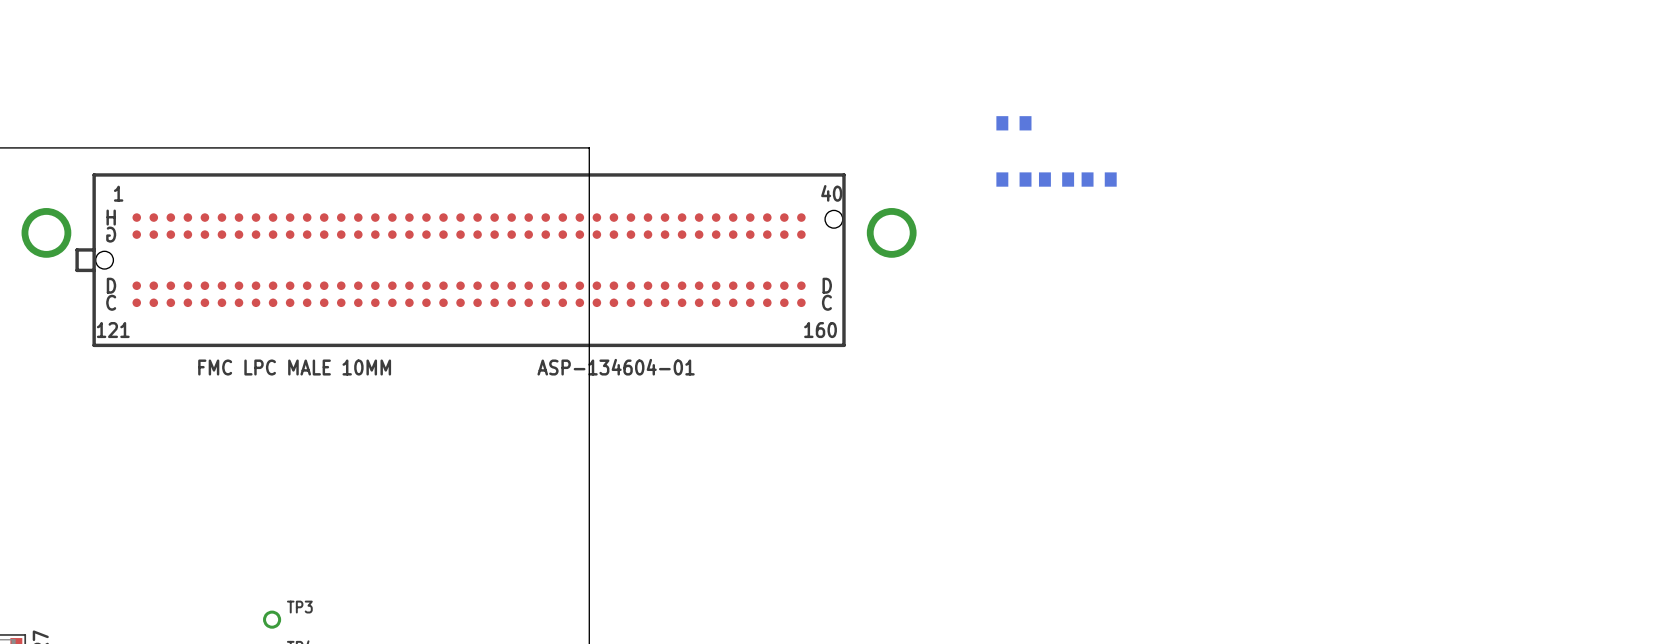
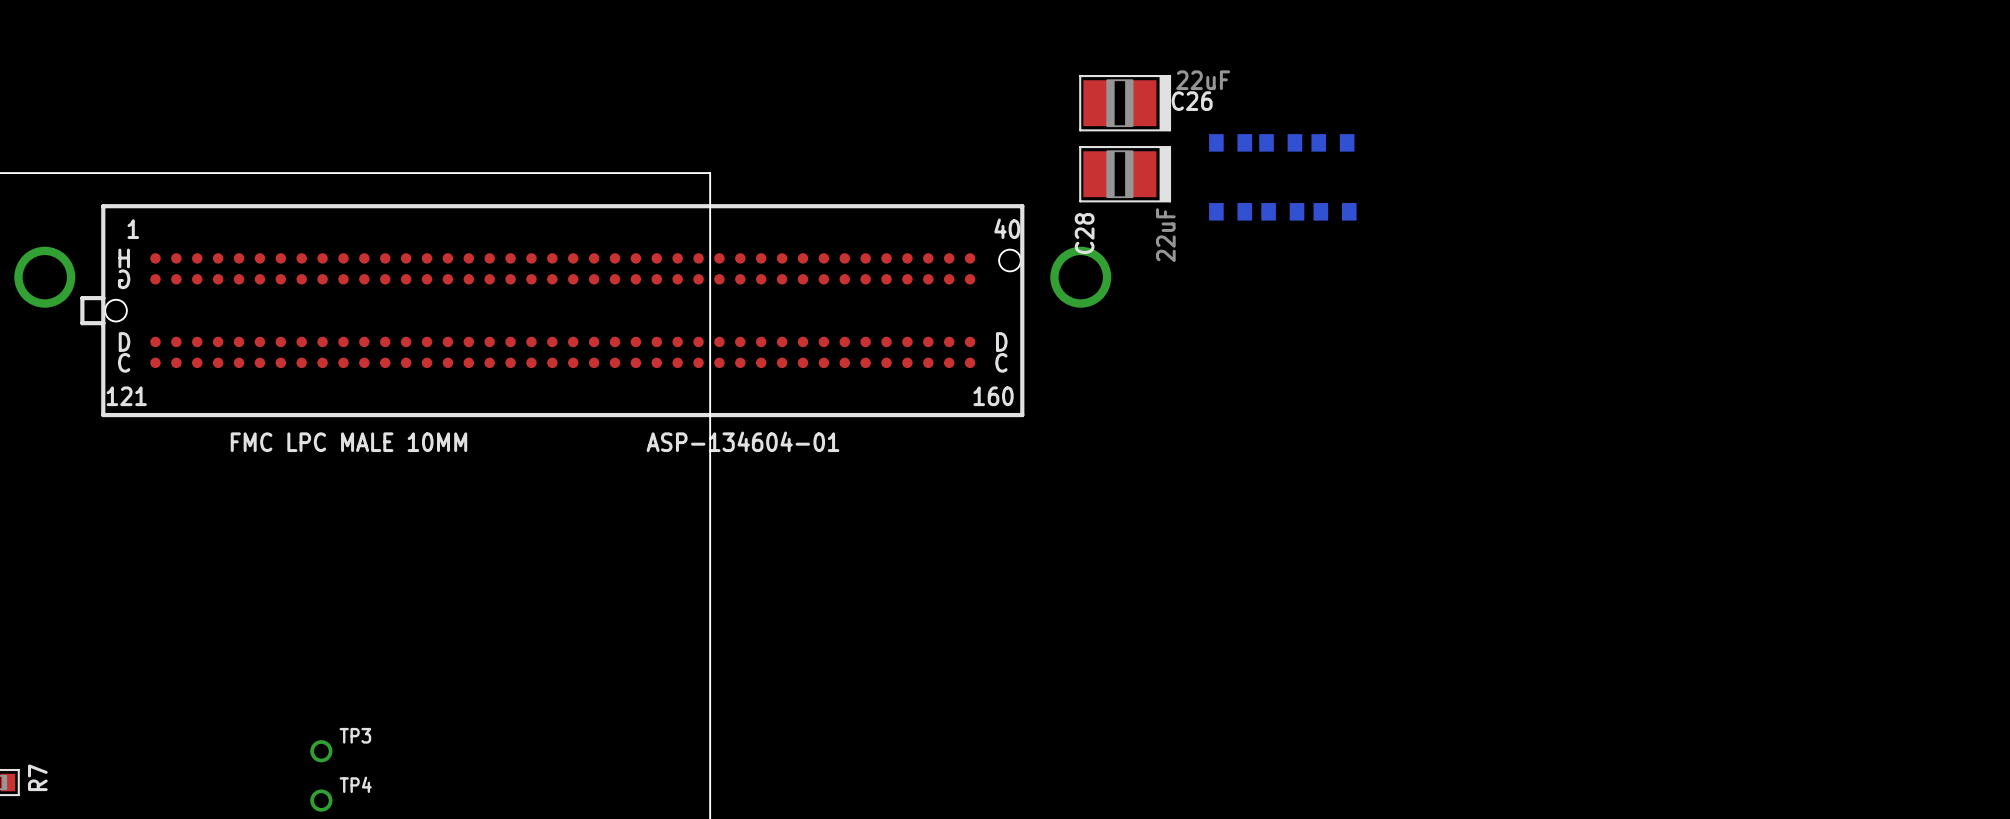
C26: none -> 22uF (1125, 103)
part: none -> (1280, 142)
part: none -> (1332, 142)
C28: none -> 22uF (1125, 174)

